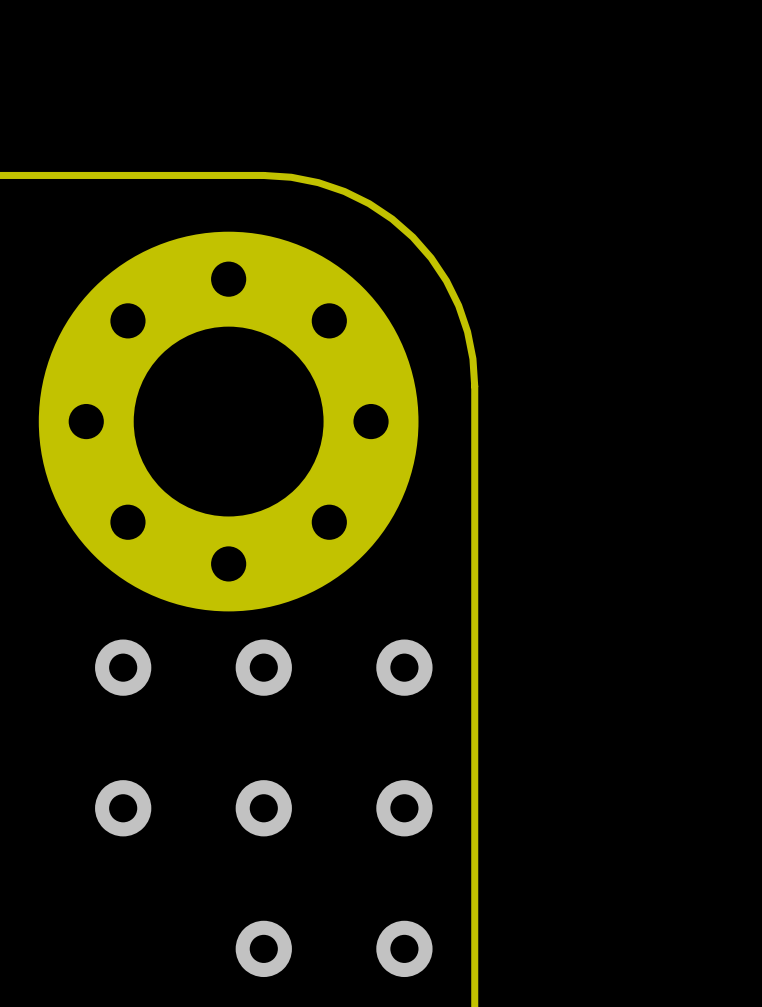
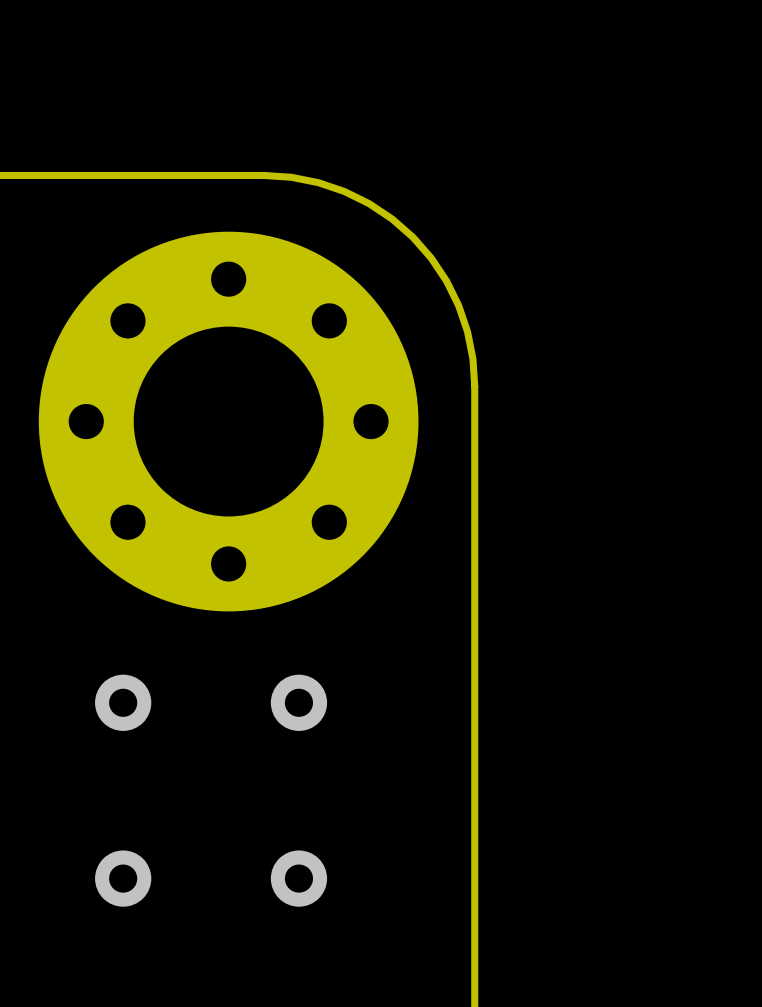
via position: (123, 667) -> (123, 702)
via position: (263, 667) -> (298, 702)
via: (404, 667) -> none
via: (123, 808) -> none
via: (263, 808) -> none
via: (404, 808) -> none
via: none -> (123, 878)
via: none -> (298, 878)
via: (263, 948) -> none
via: (404, 948) -> none

